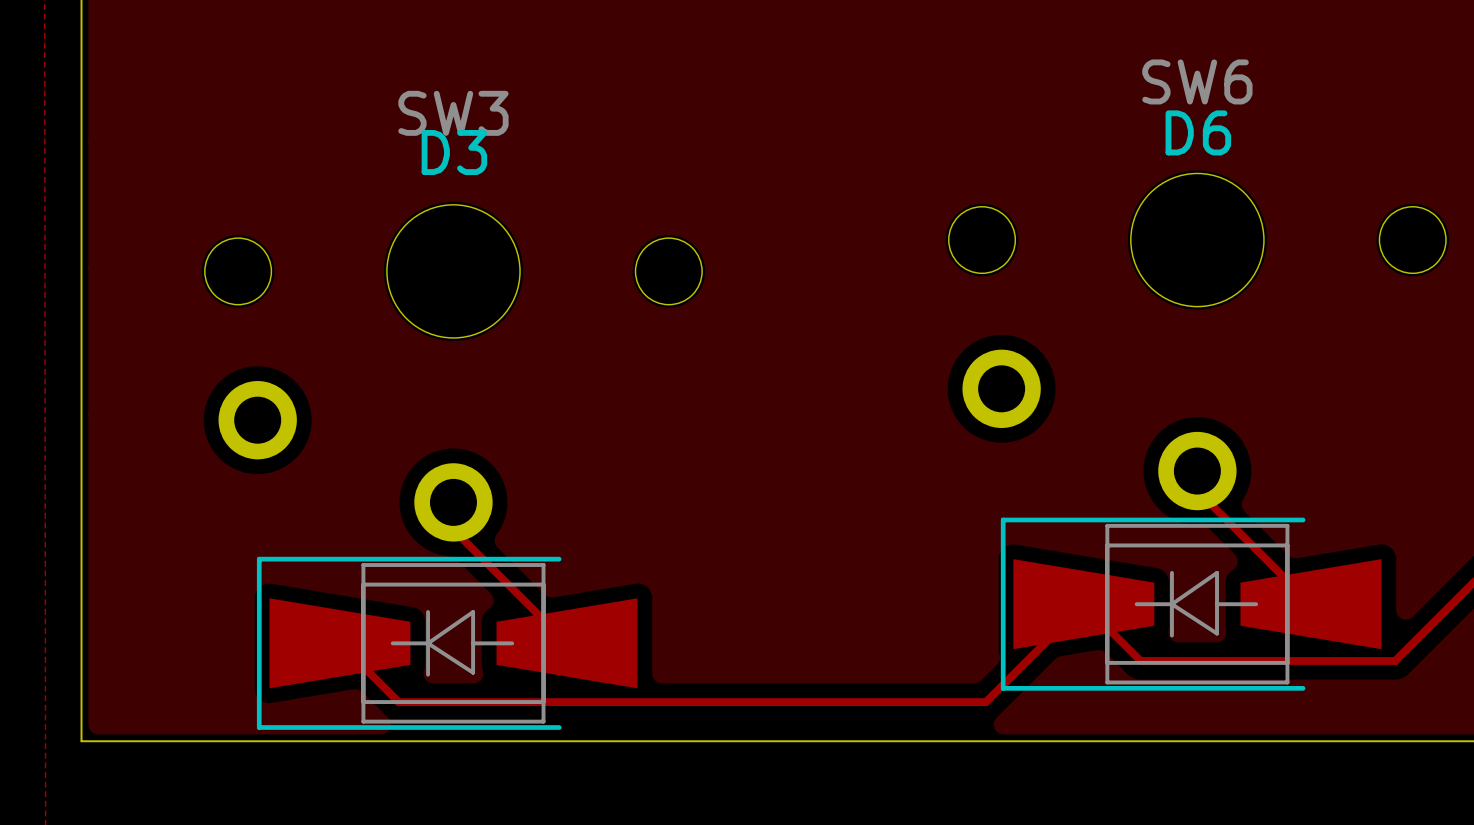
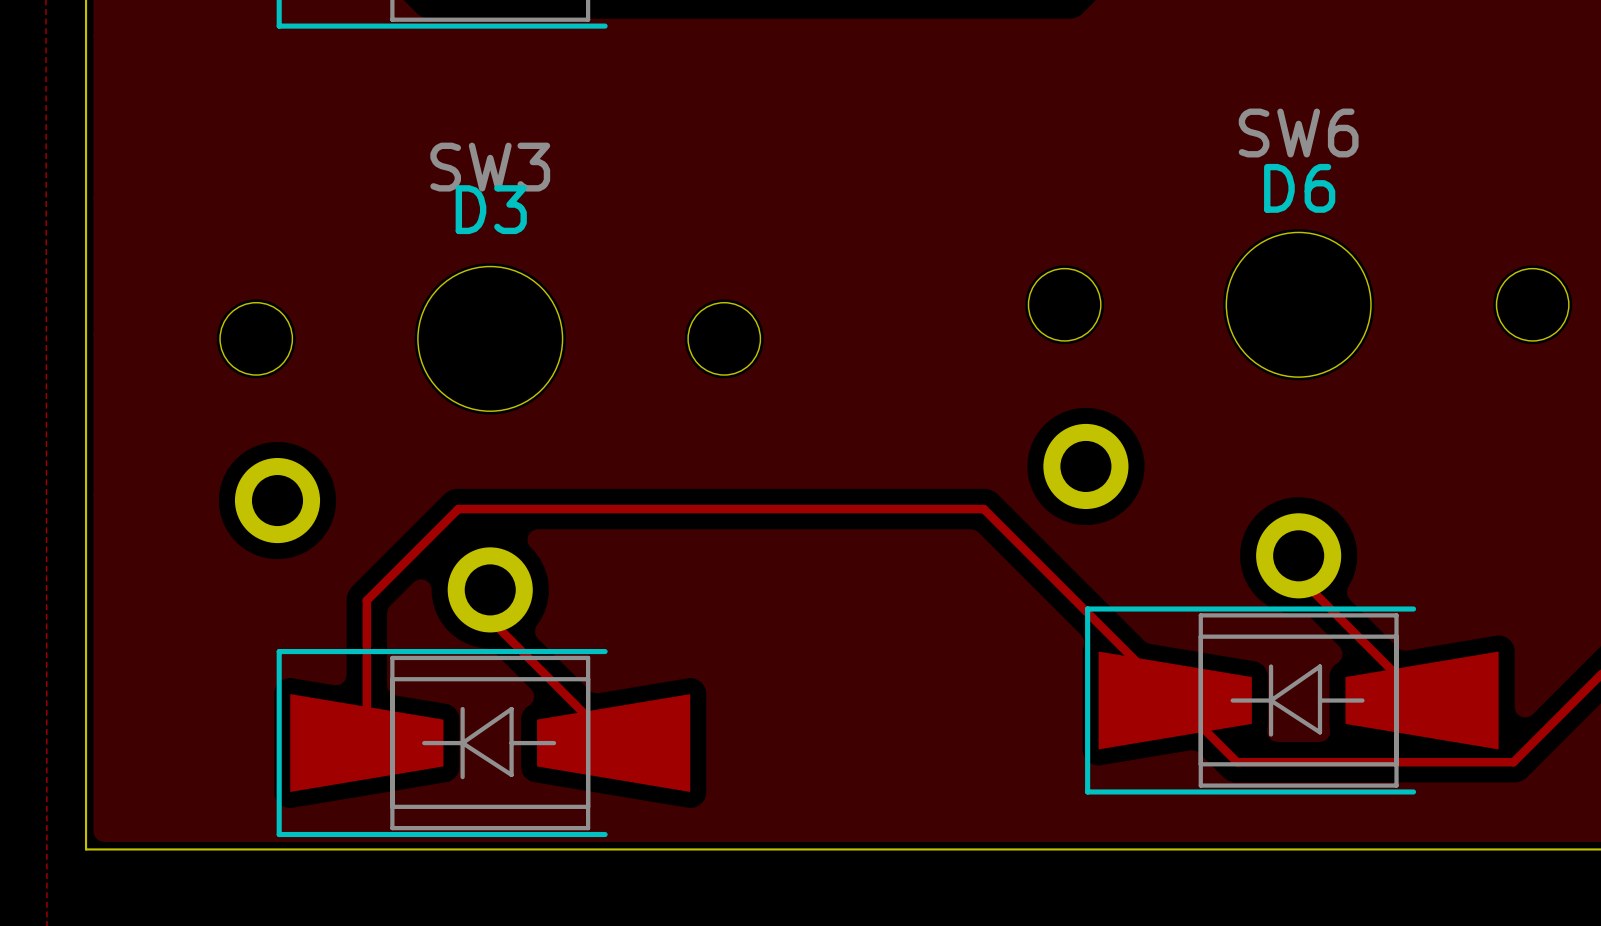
track: (1083, 604) (985, 702) (398, 702) (339, 643) -> (1175, 700) (983, 509) (458, 509) (366, 600) (366, 743)

